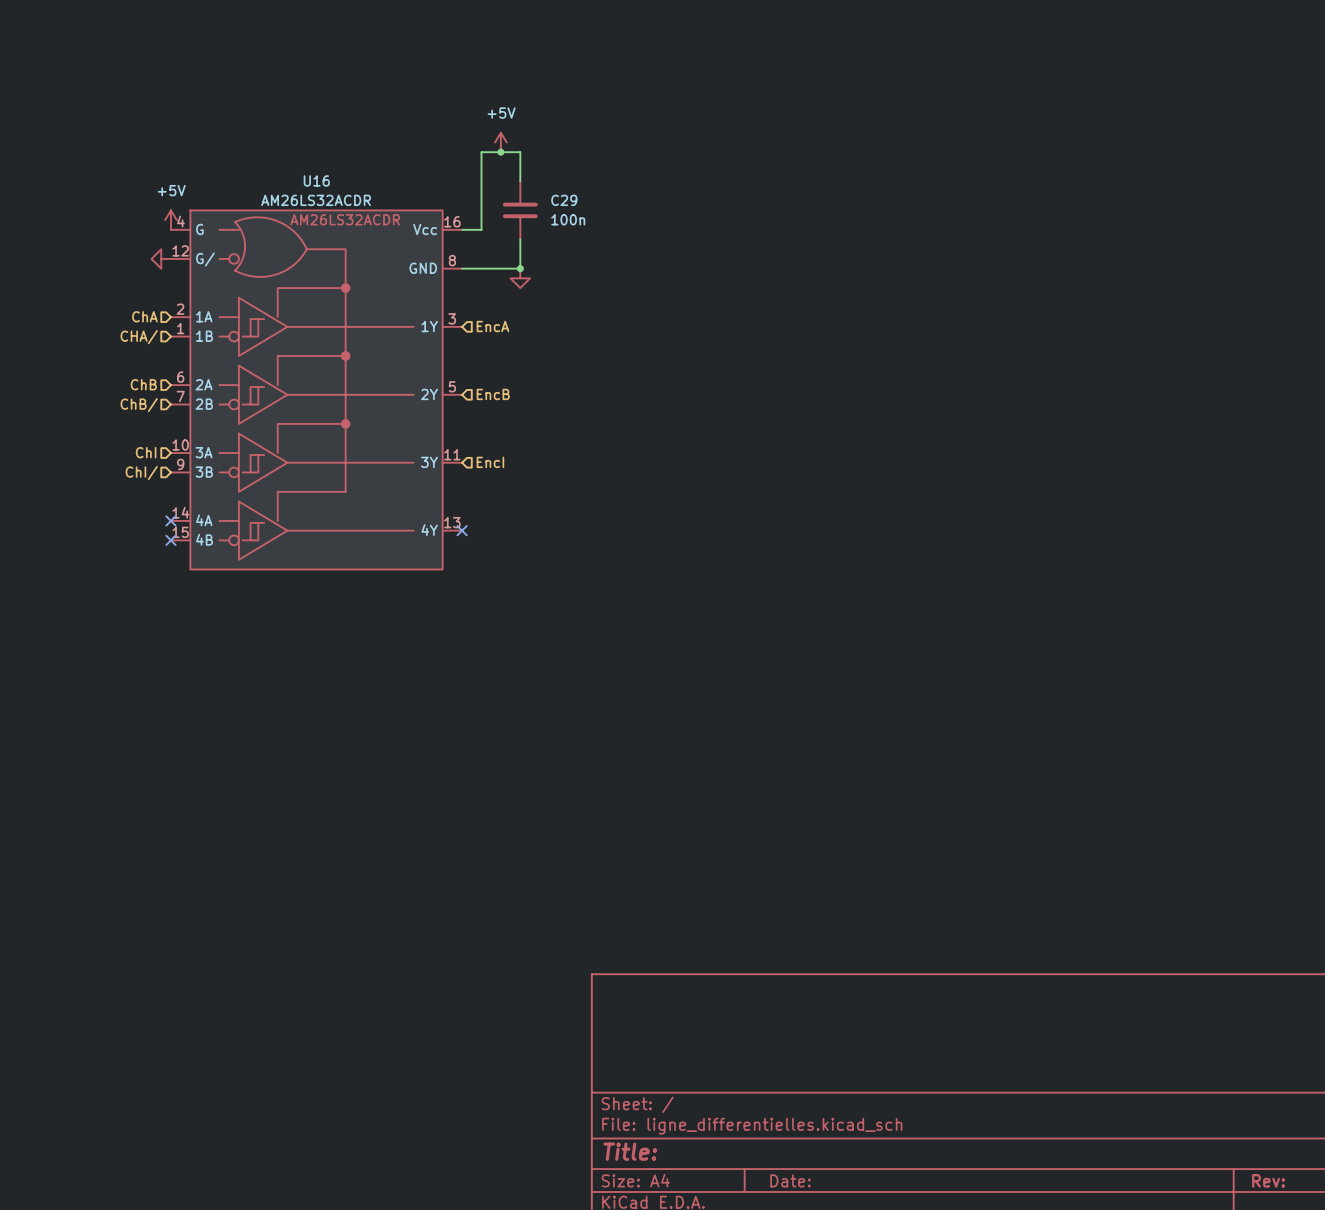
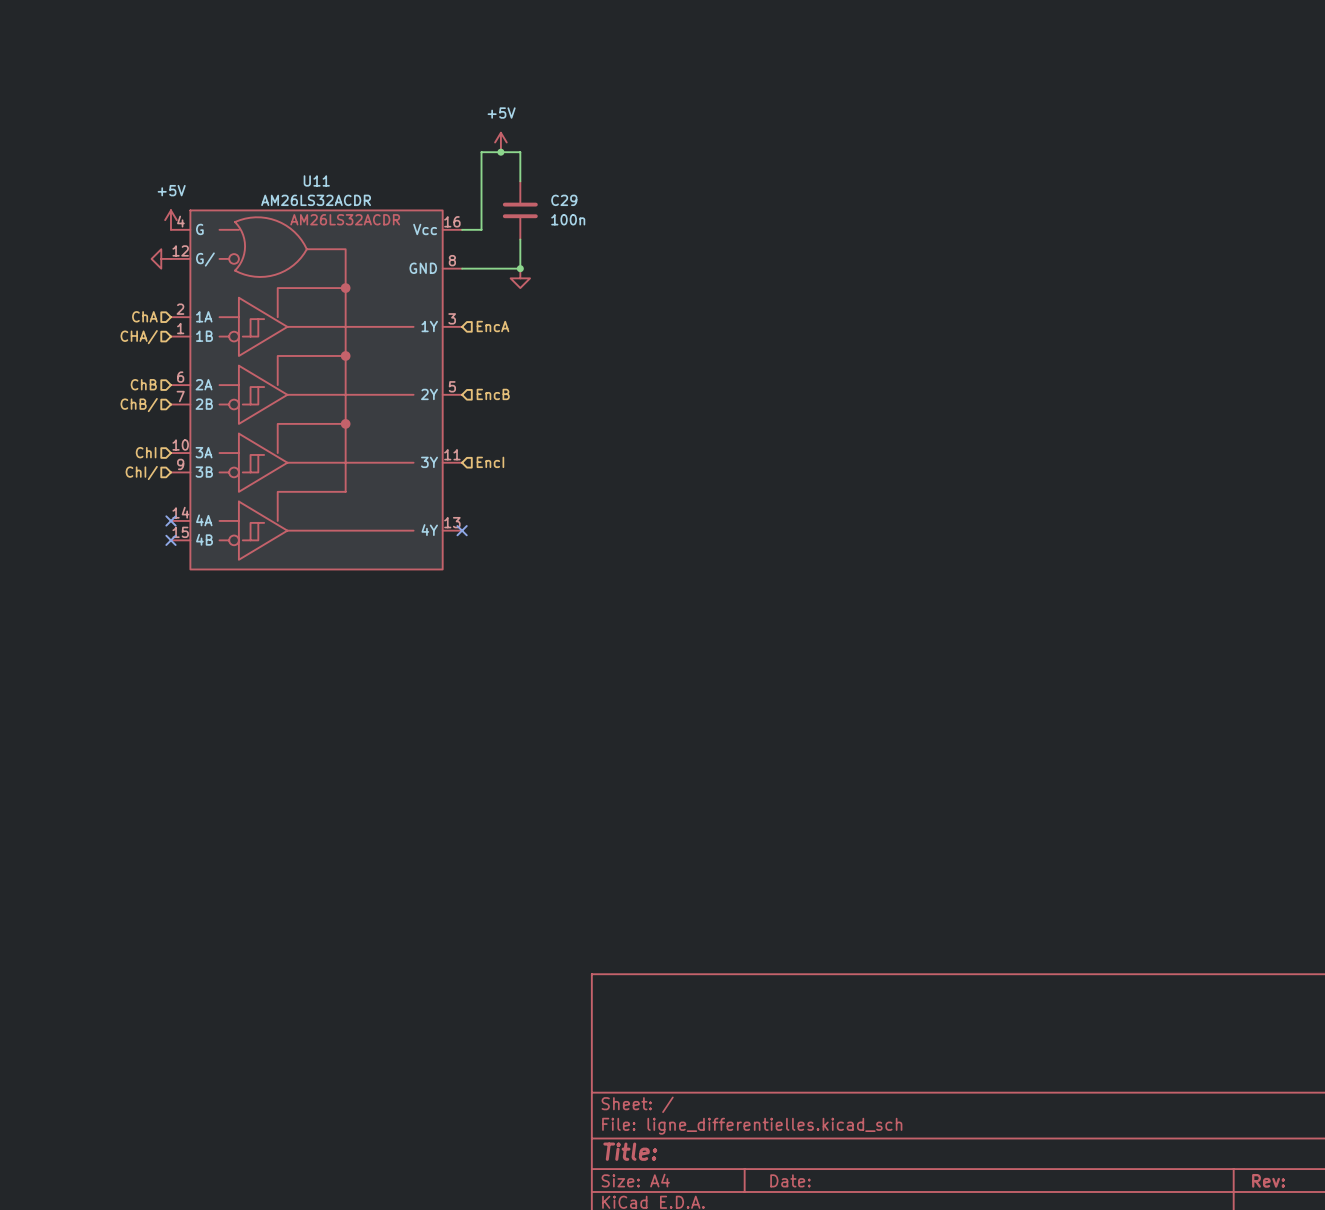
U16 name: U16 (316, 180) -> U11 (316, 180)

